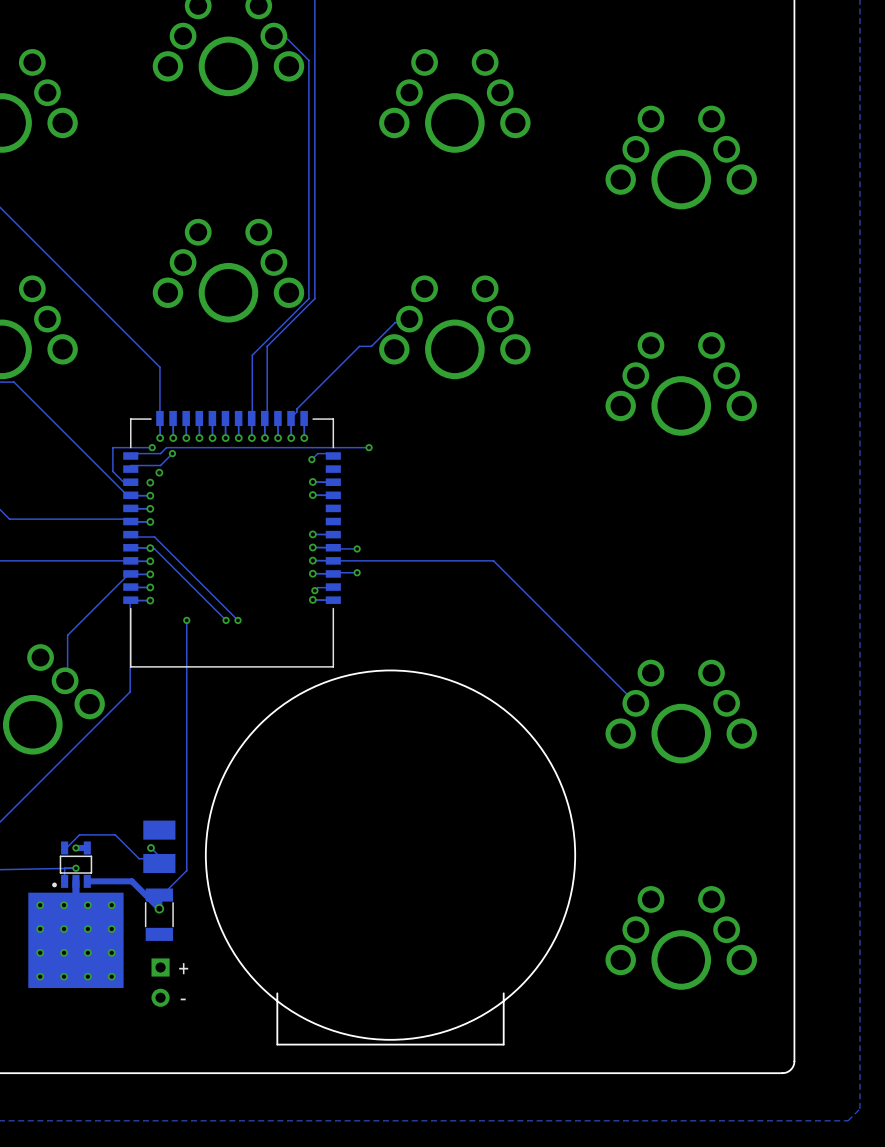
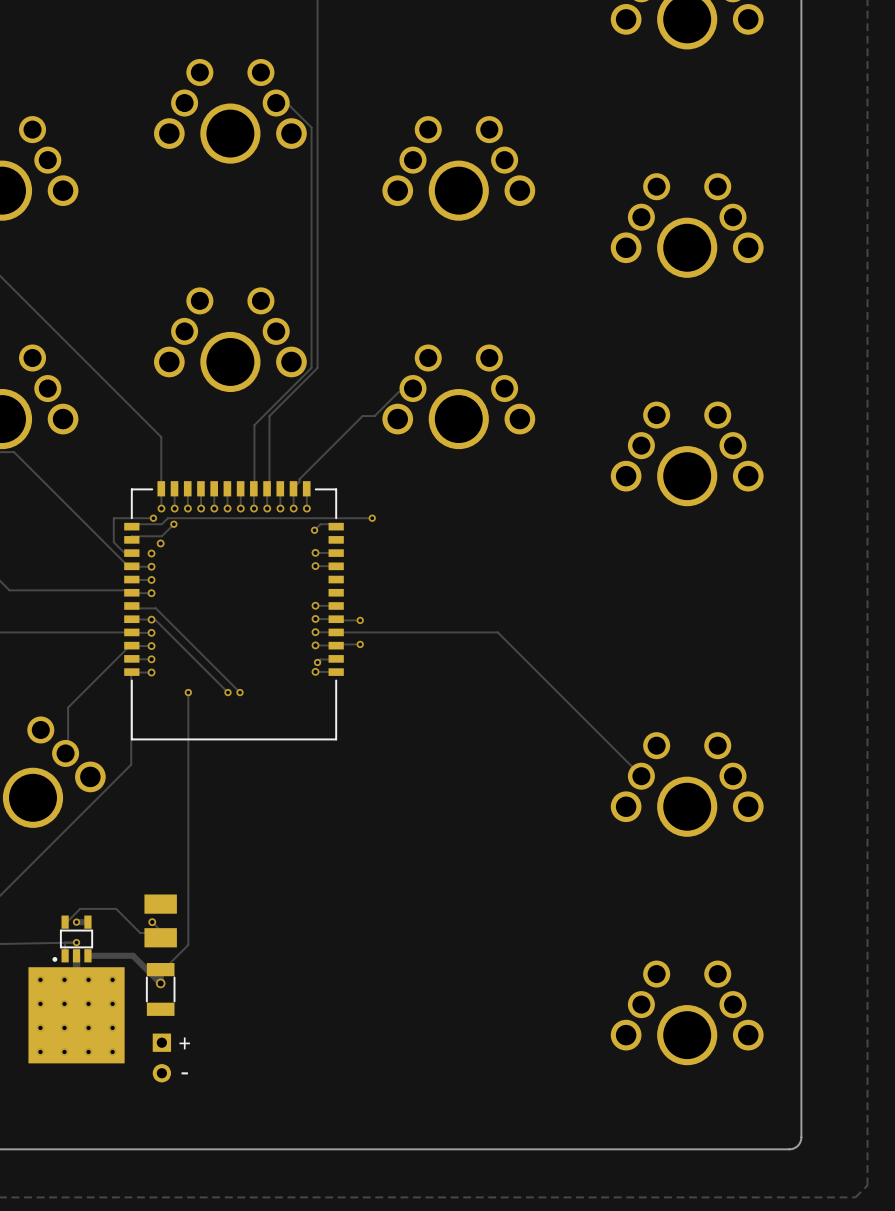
round board edge: [204, 669, 577, 1041] -> none
board edge: (503, 993) (503, 1044) (277, 1044) (277, 993) -> none

